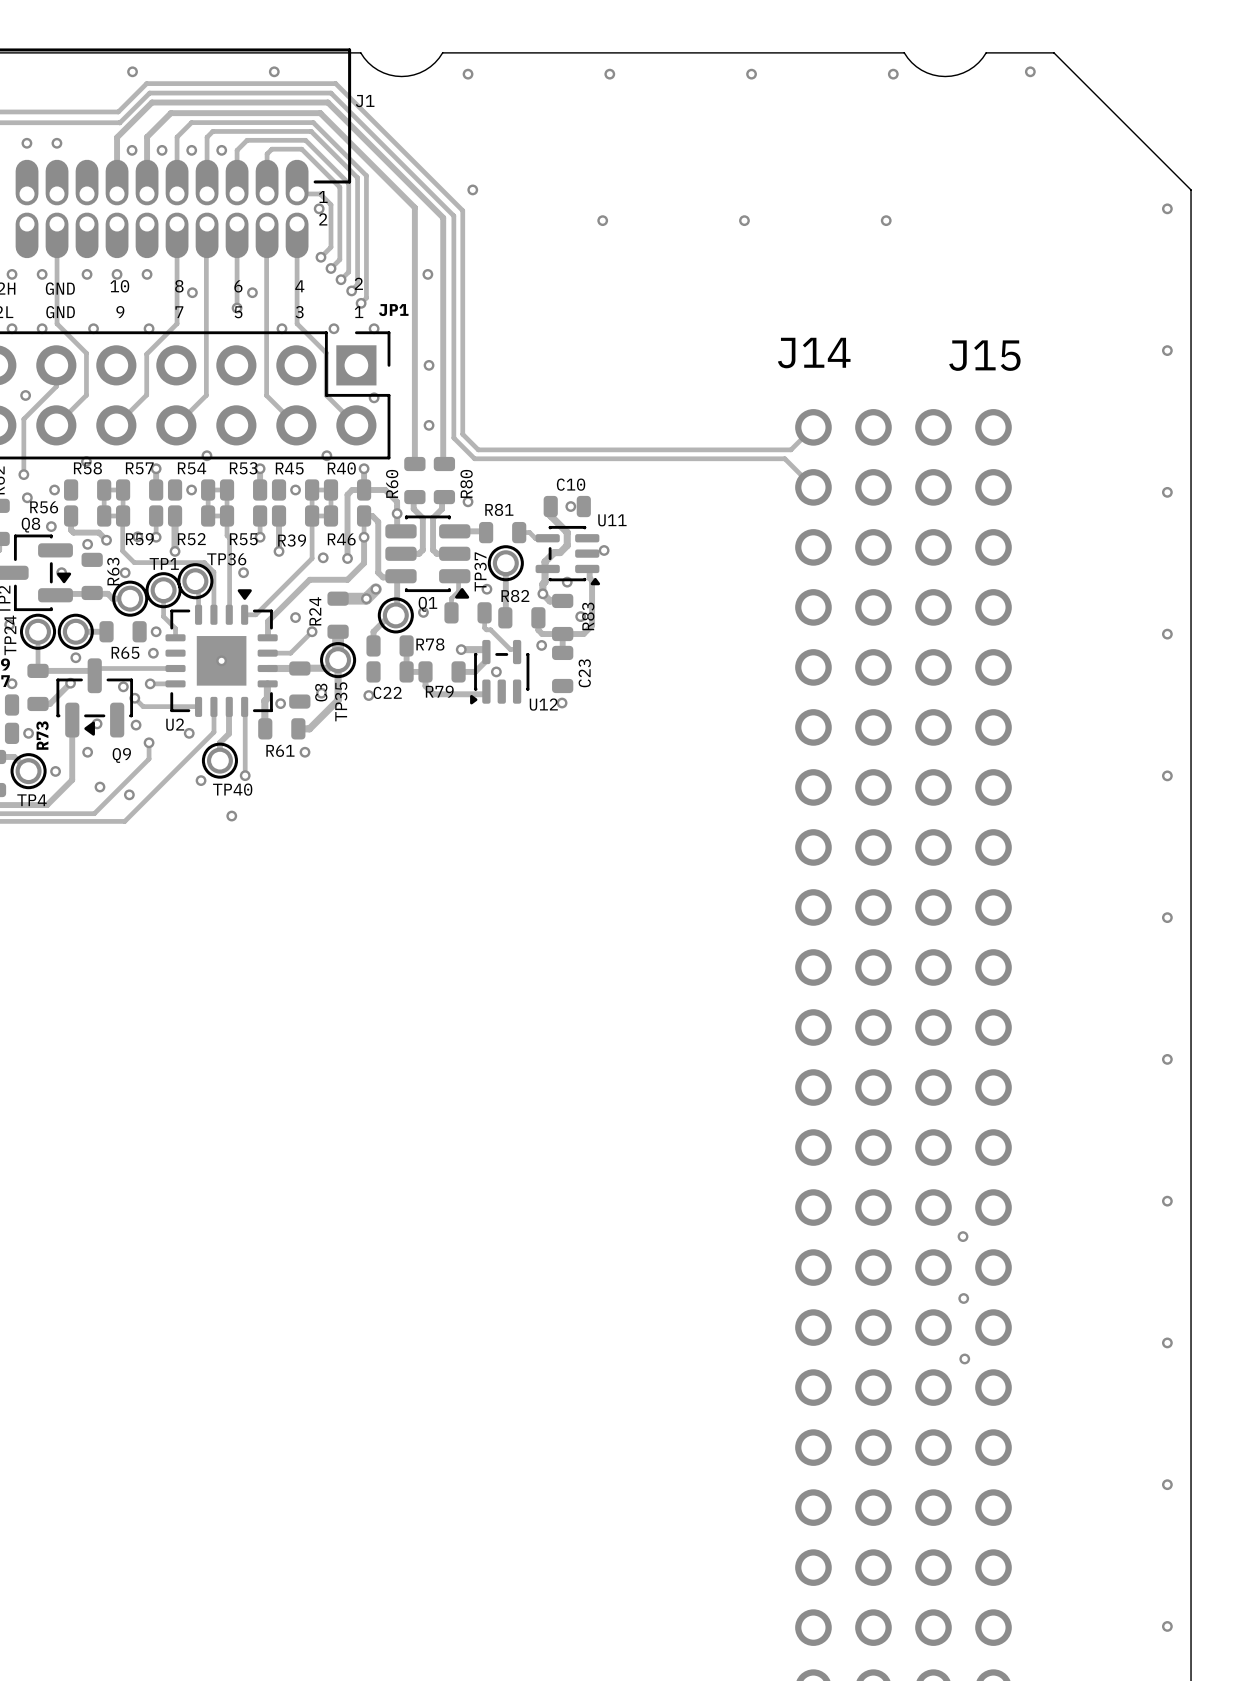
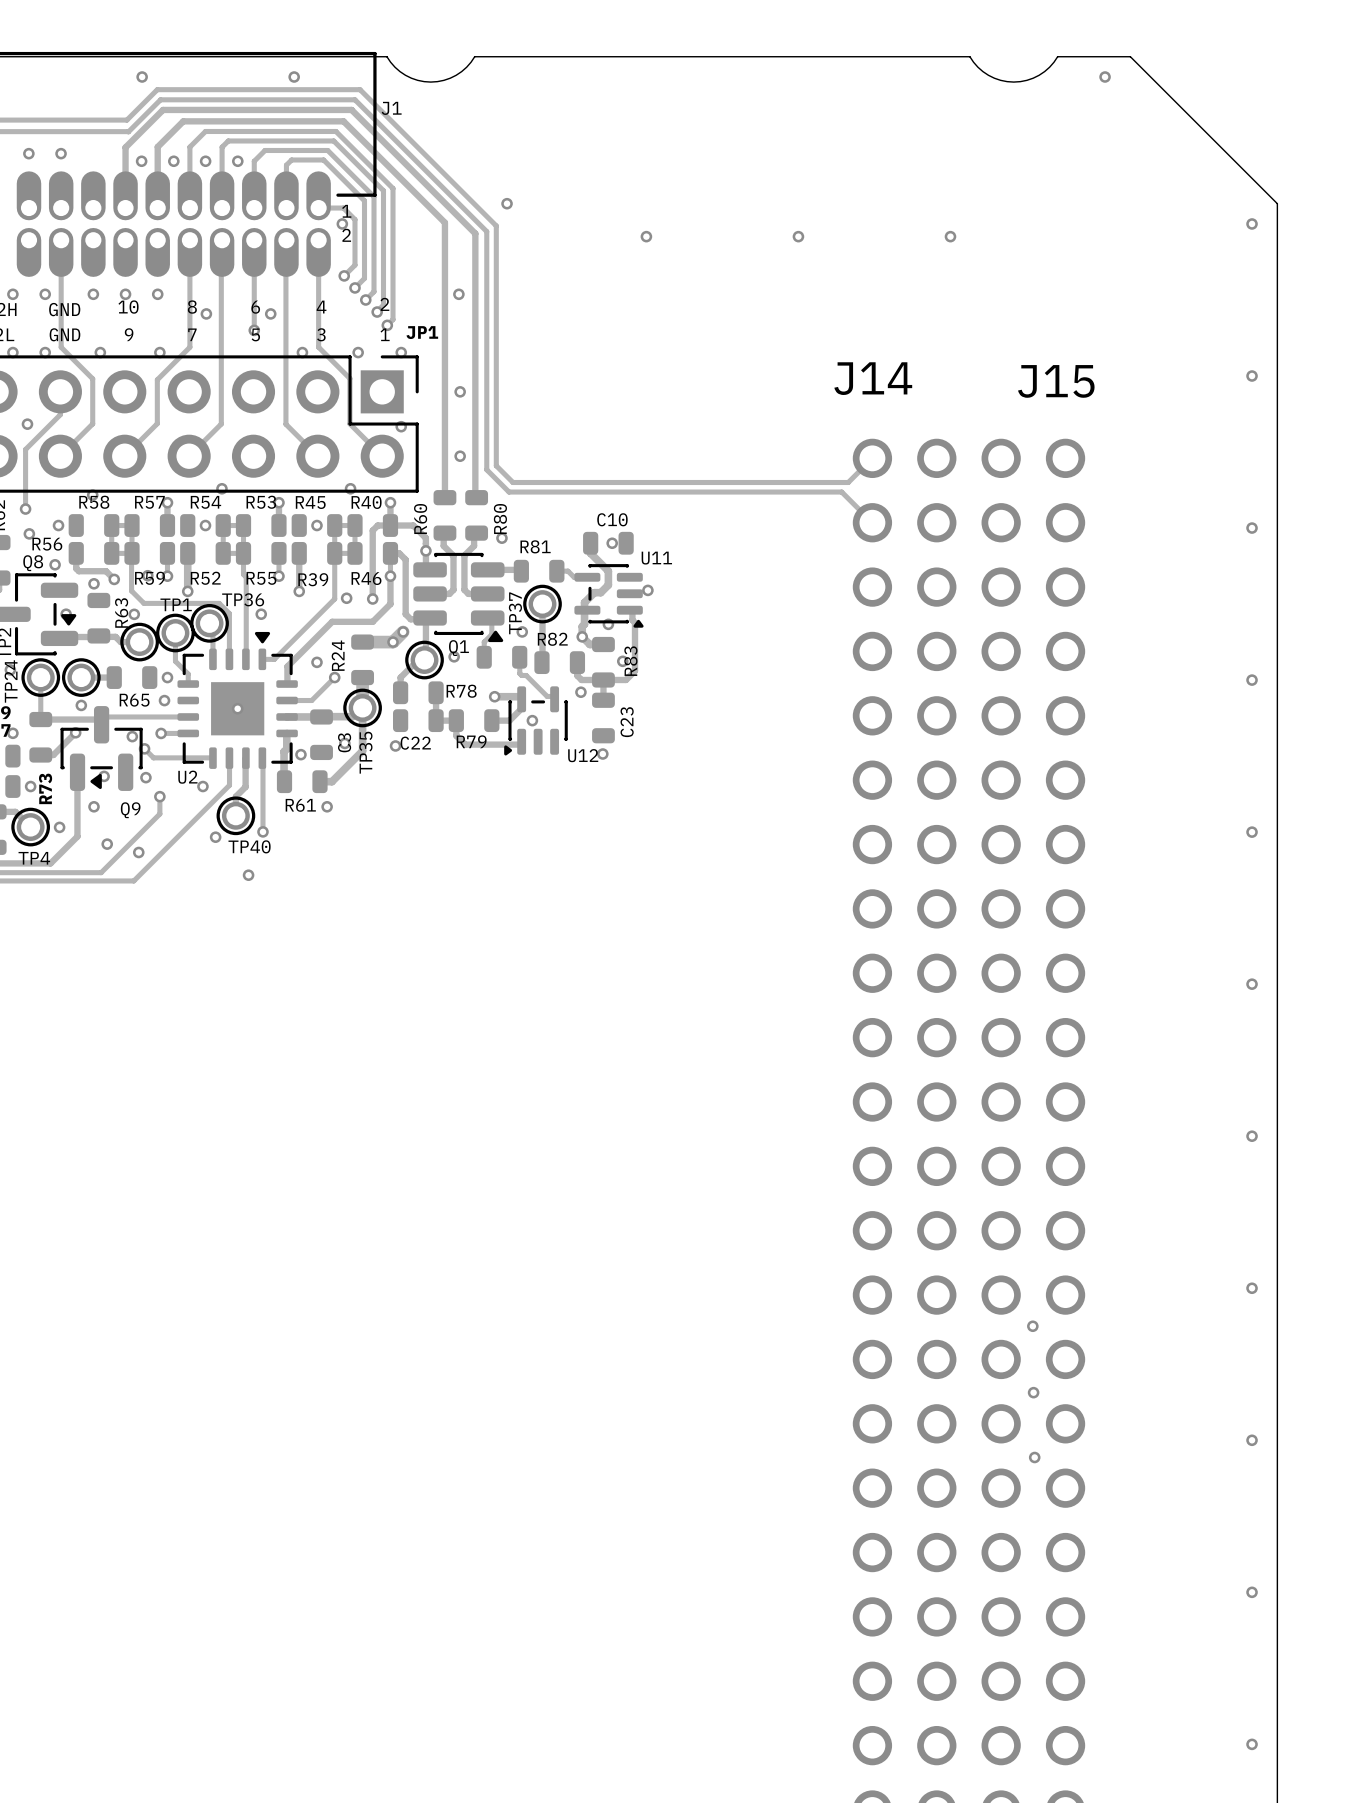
via: (468, 74) -> none
via: (609, 74) -> none
via: (751, 74) -> none
via: (893, 74) -> none

